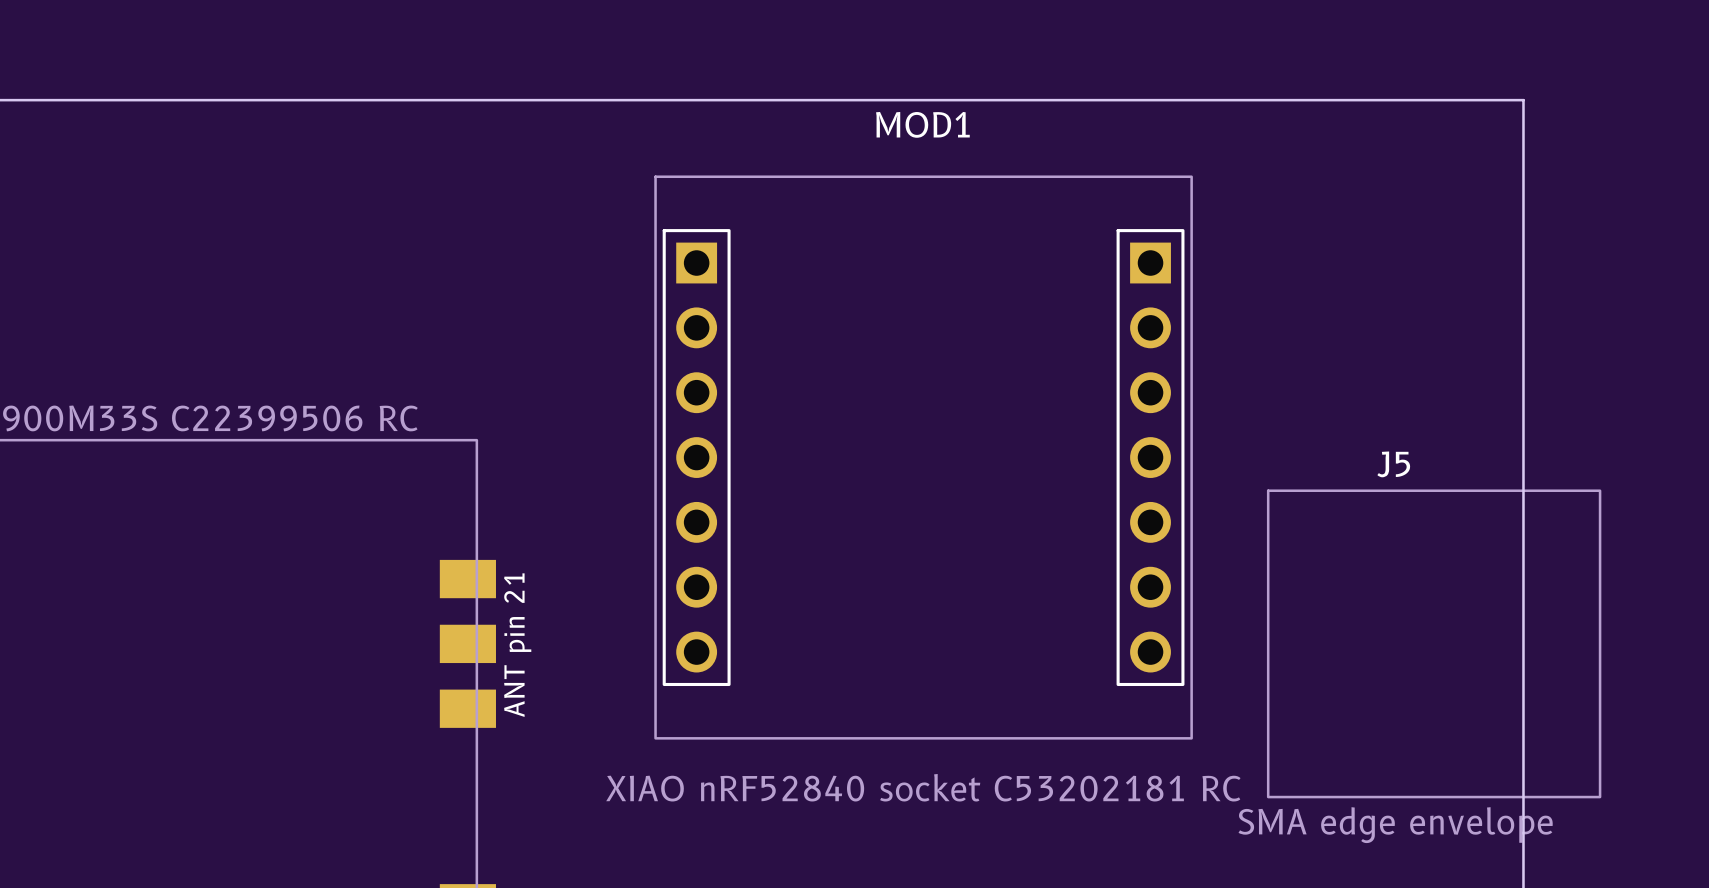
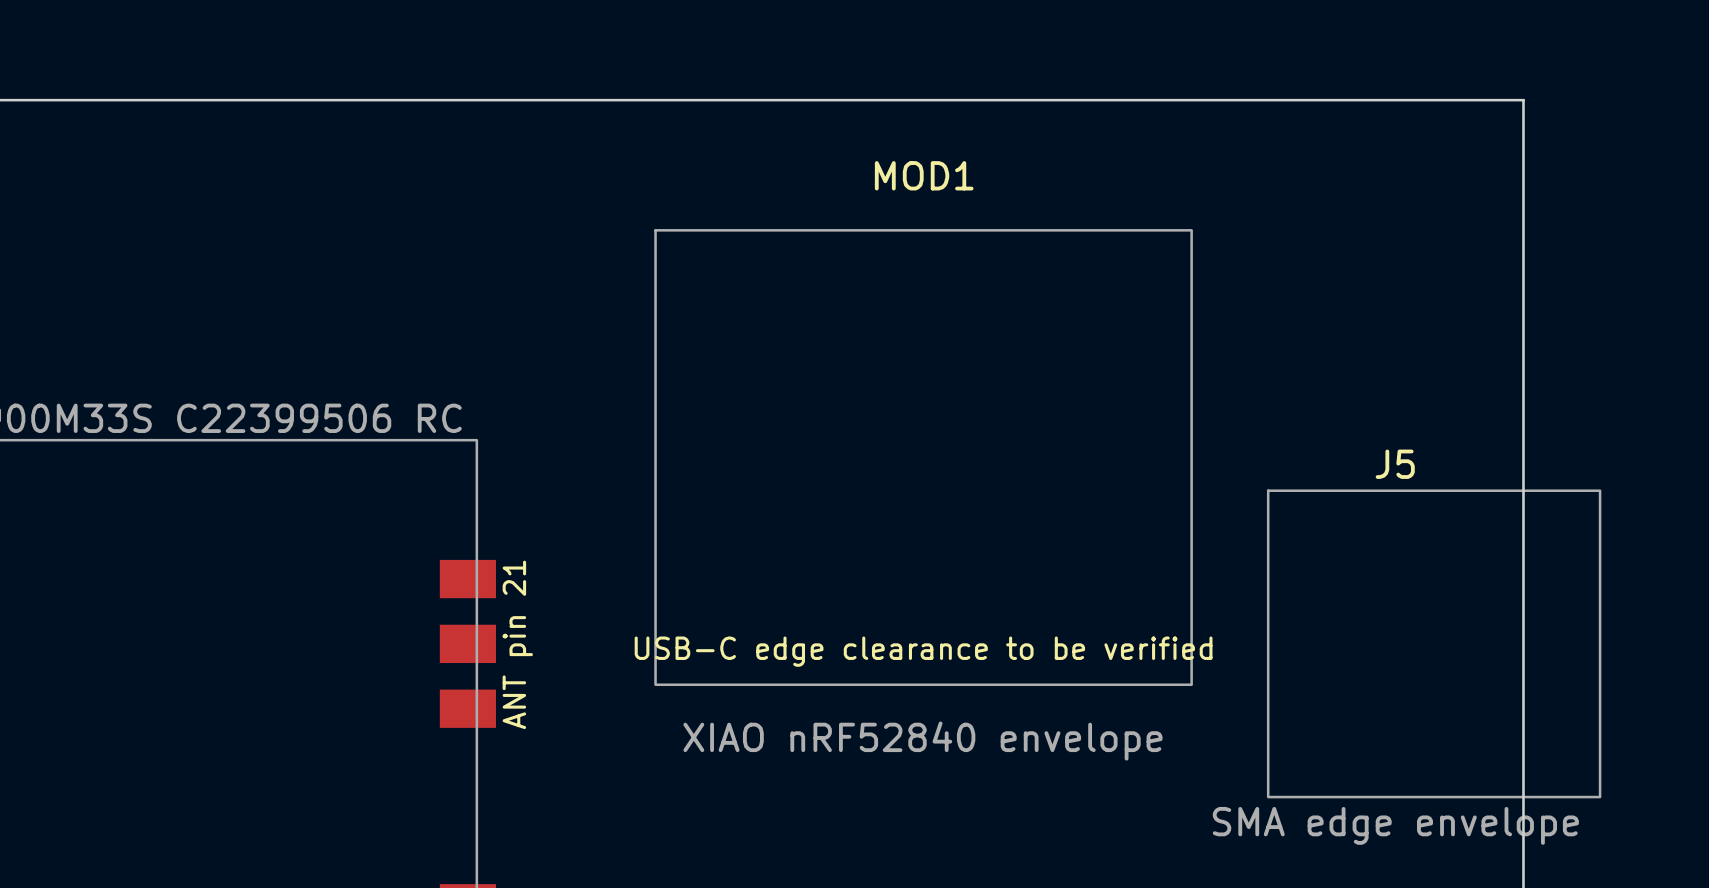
MOD1 footprint: [654, 175, 1193, 740] -> [654, 229, 1193, 687]
MOD1 value: XIAO nRF52840 socket C53202181 RC (923, 787) -> XIAO nRF52840 envelope (922, 741)

